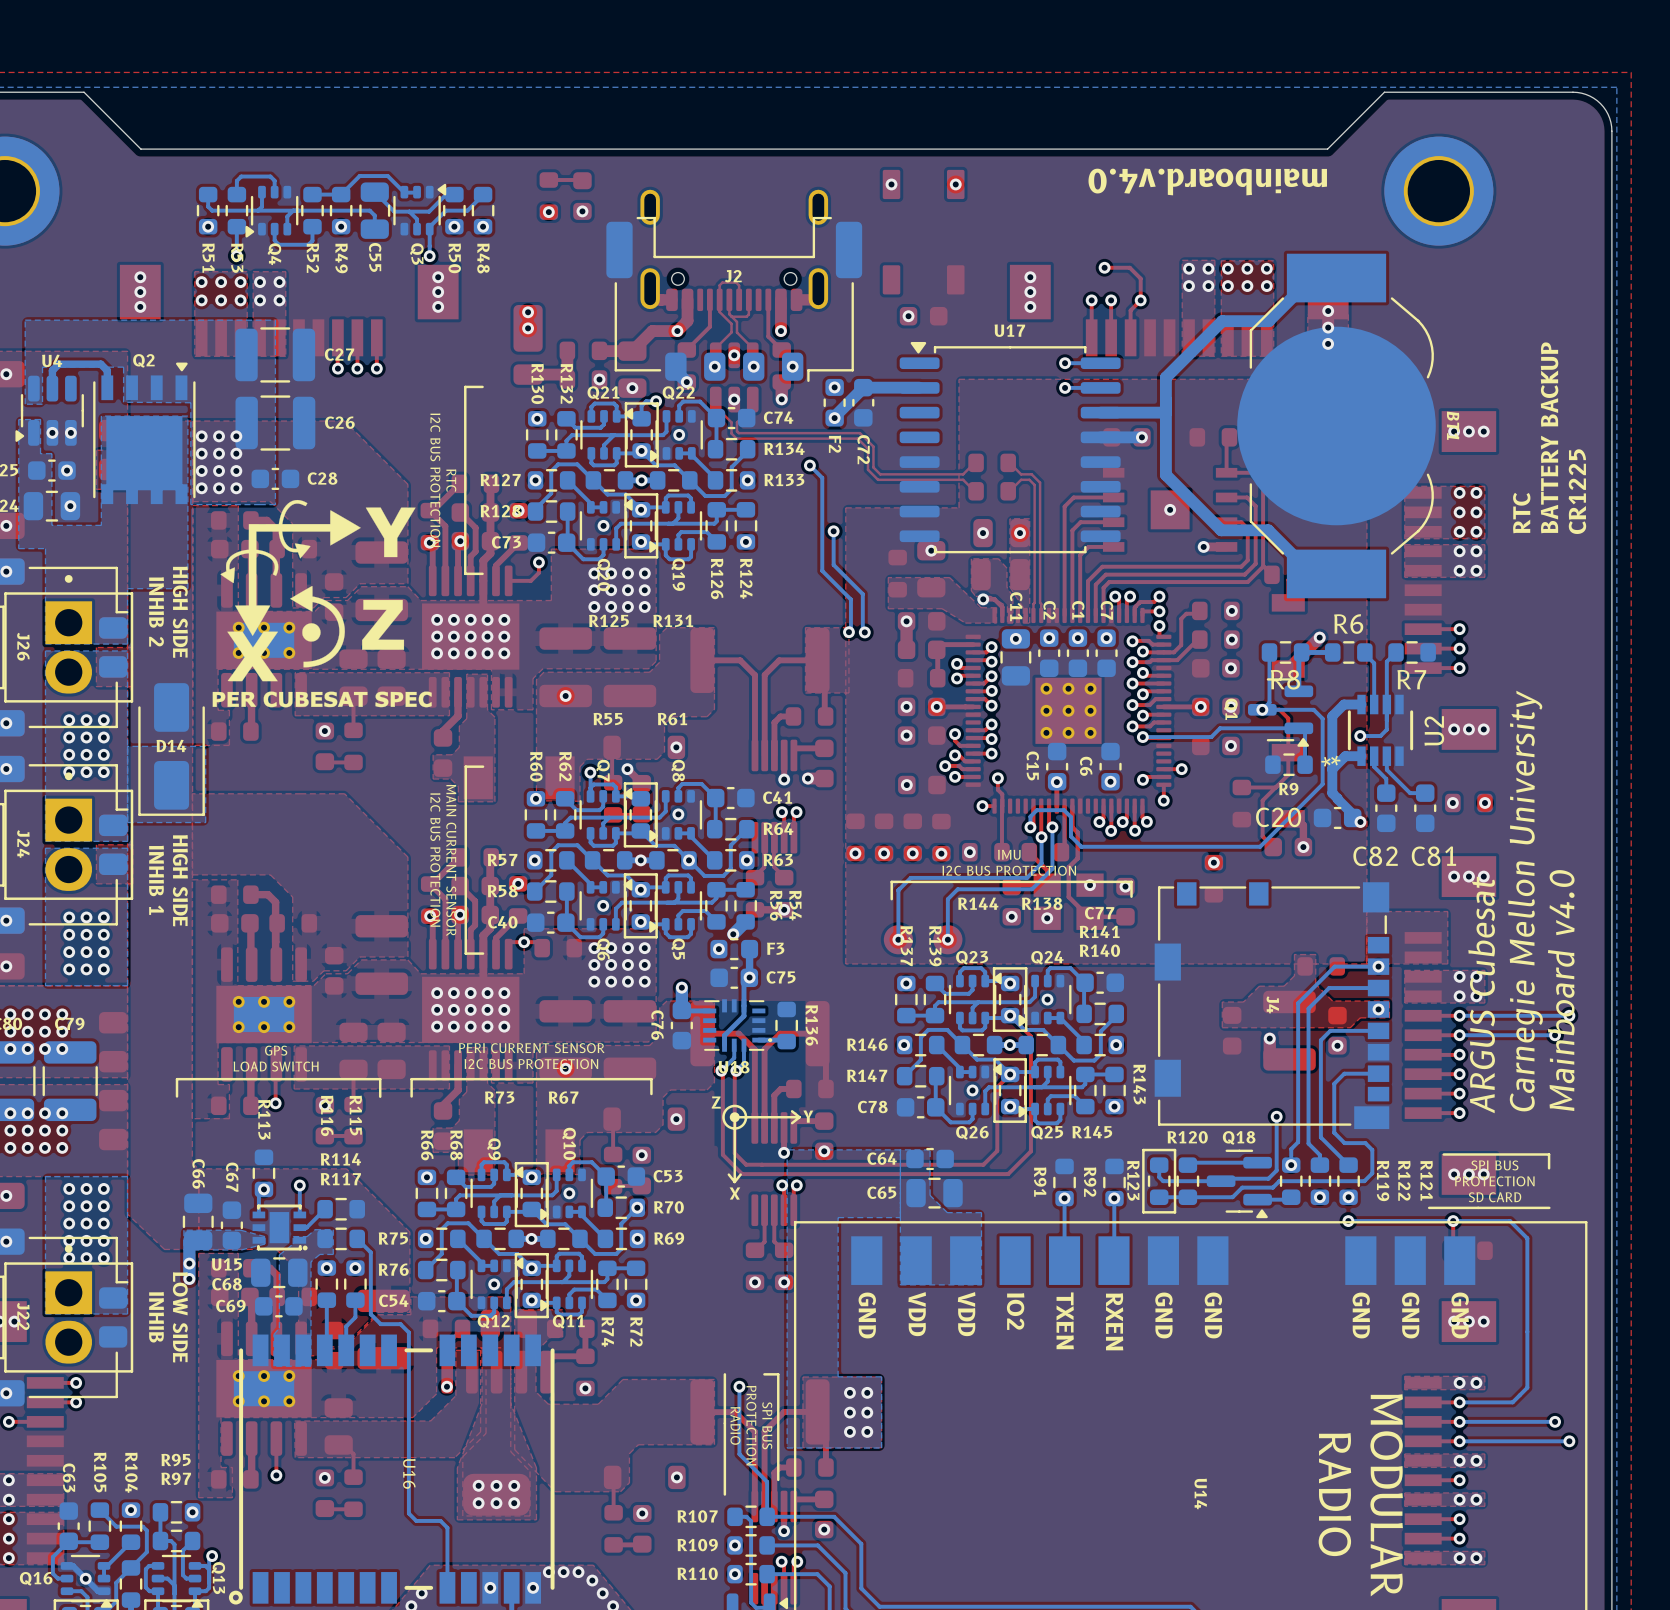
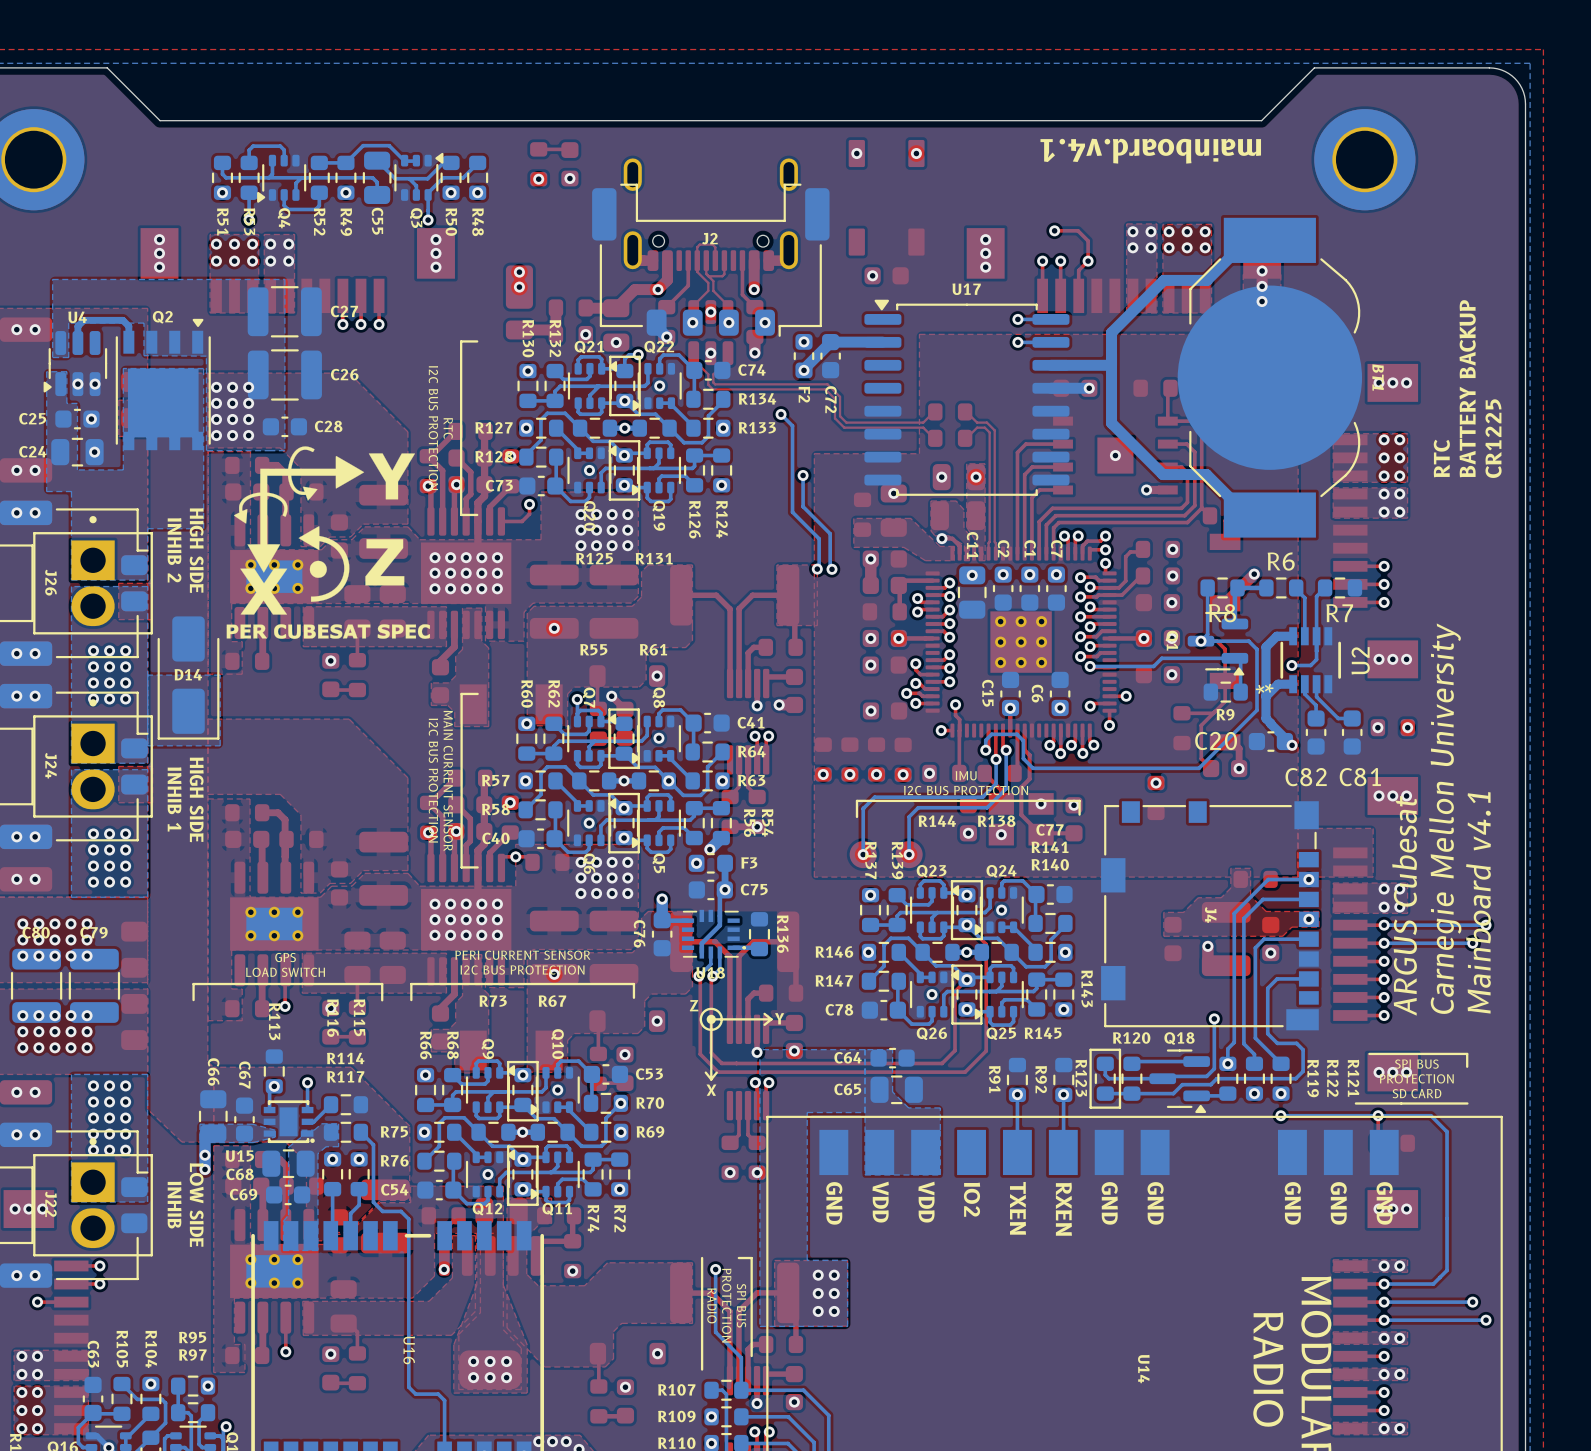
text: mainboard.v4.0 (1207, 181) -> mainboard.v4.1 (1150, 151)
text: Mainboard v4.0 (1561, 990) -> Mainboard v4.1 (1478, 902)

